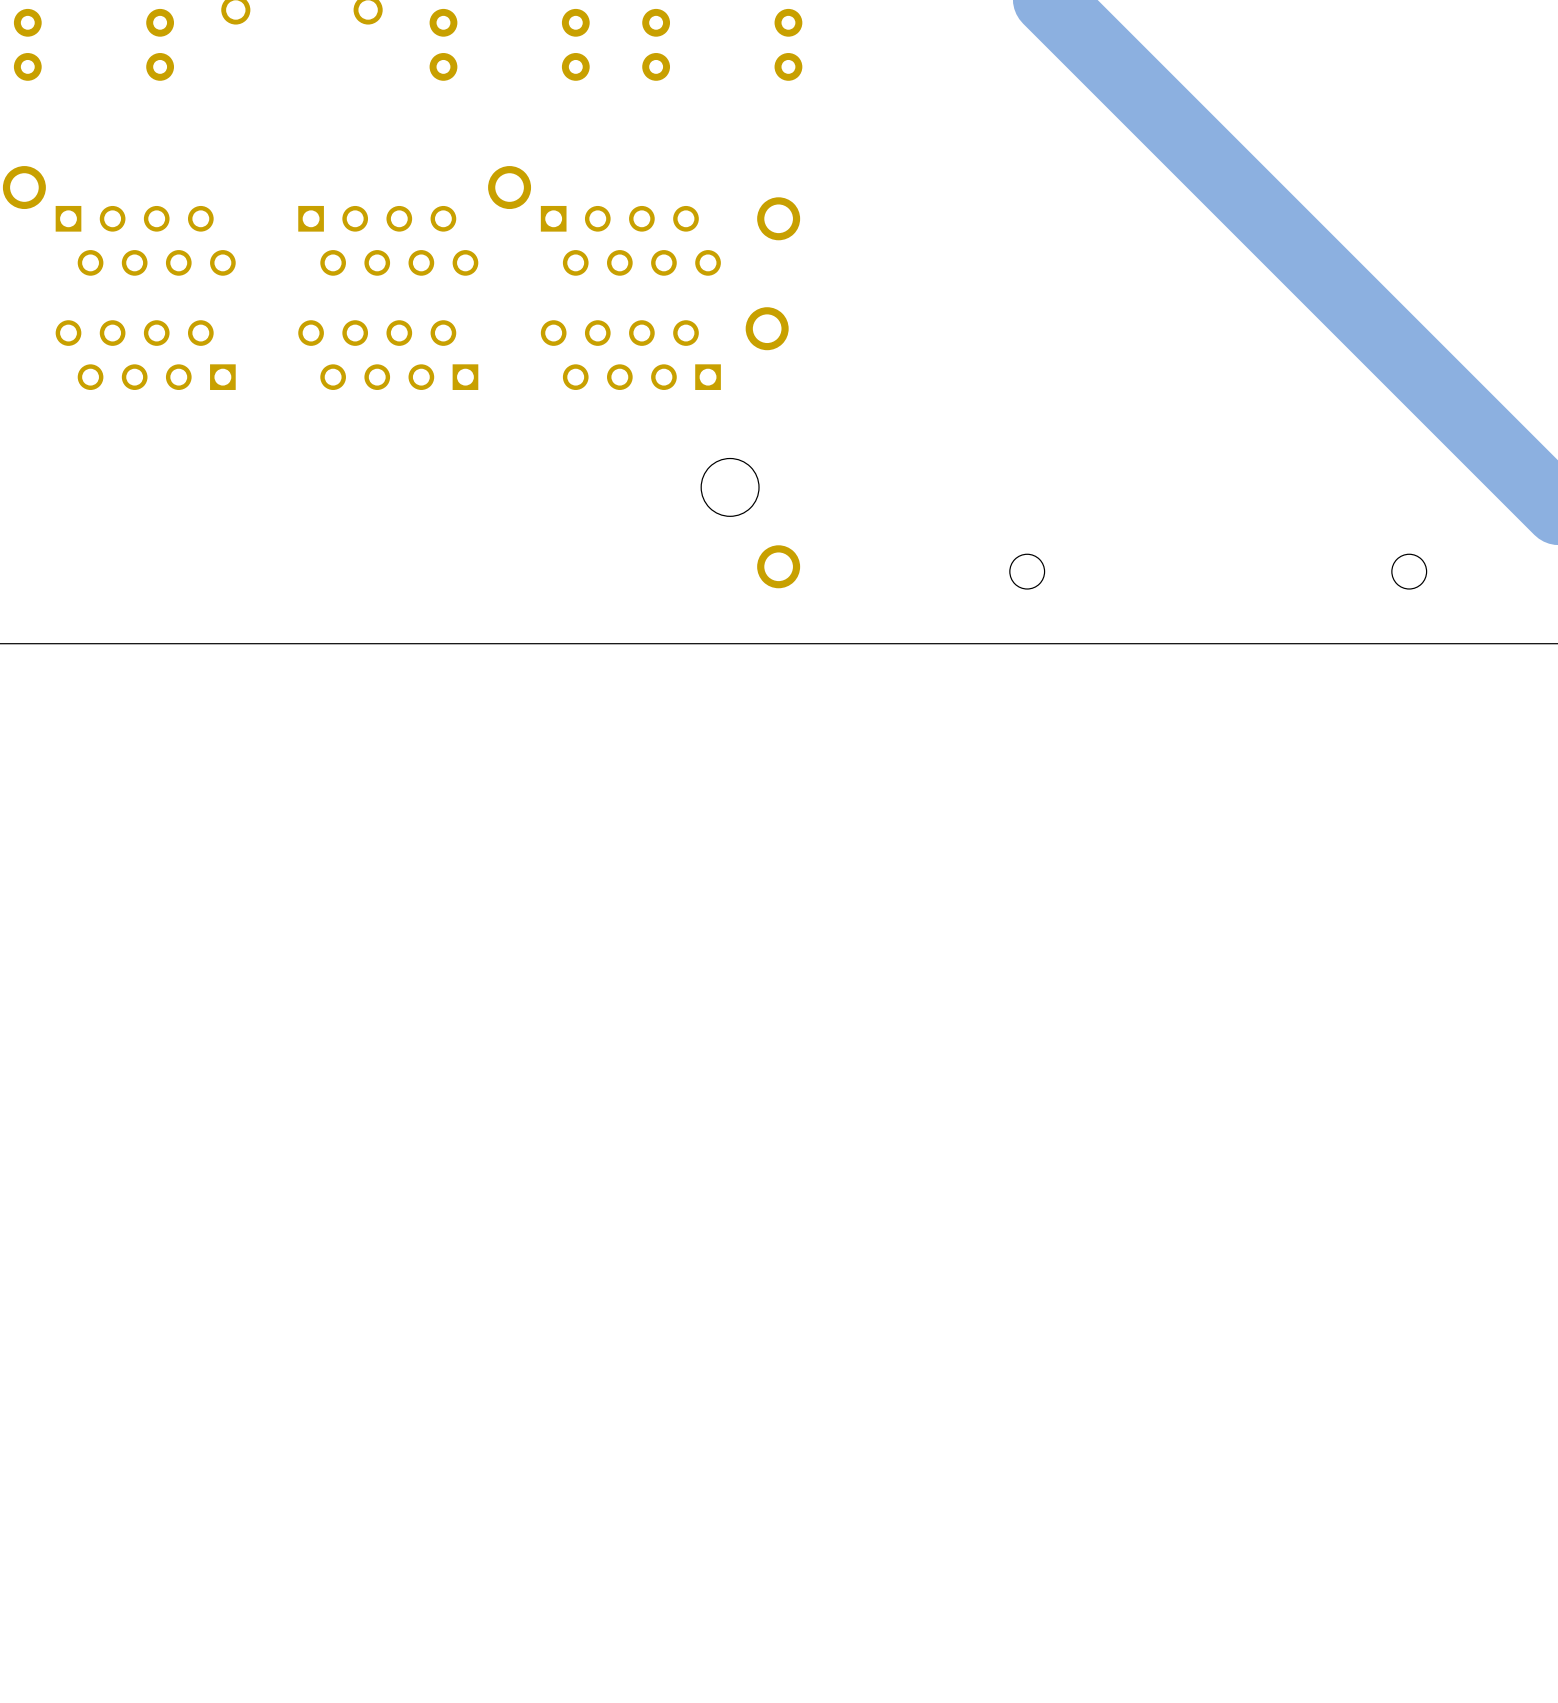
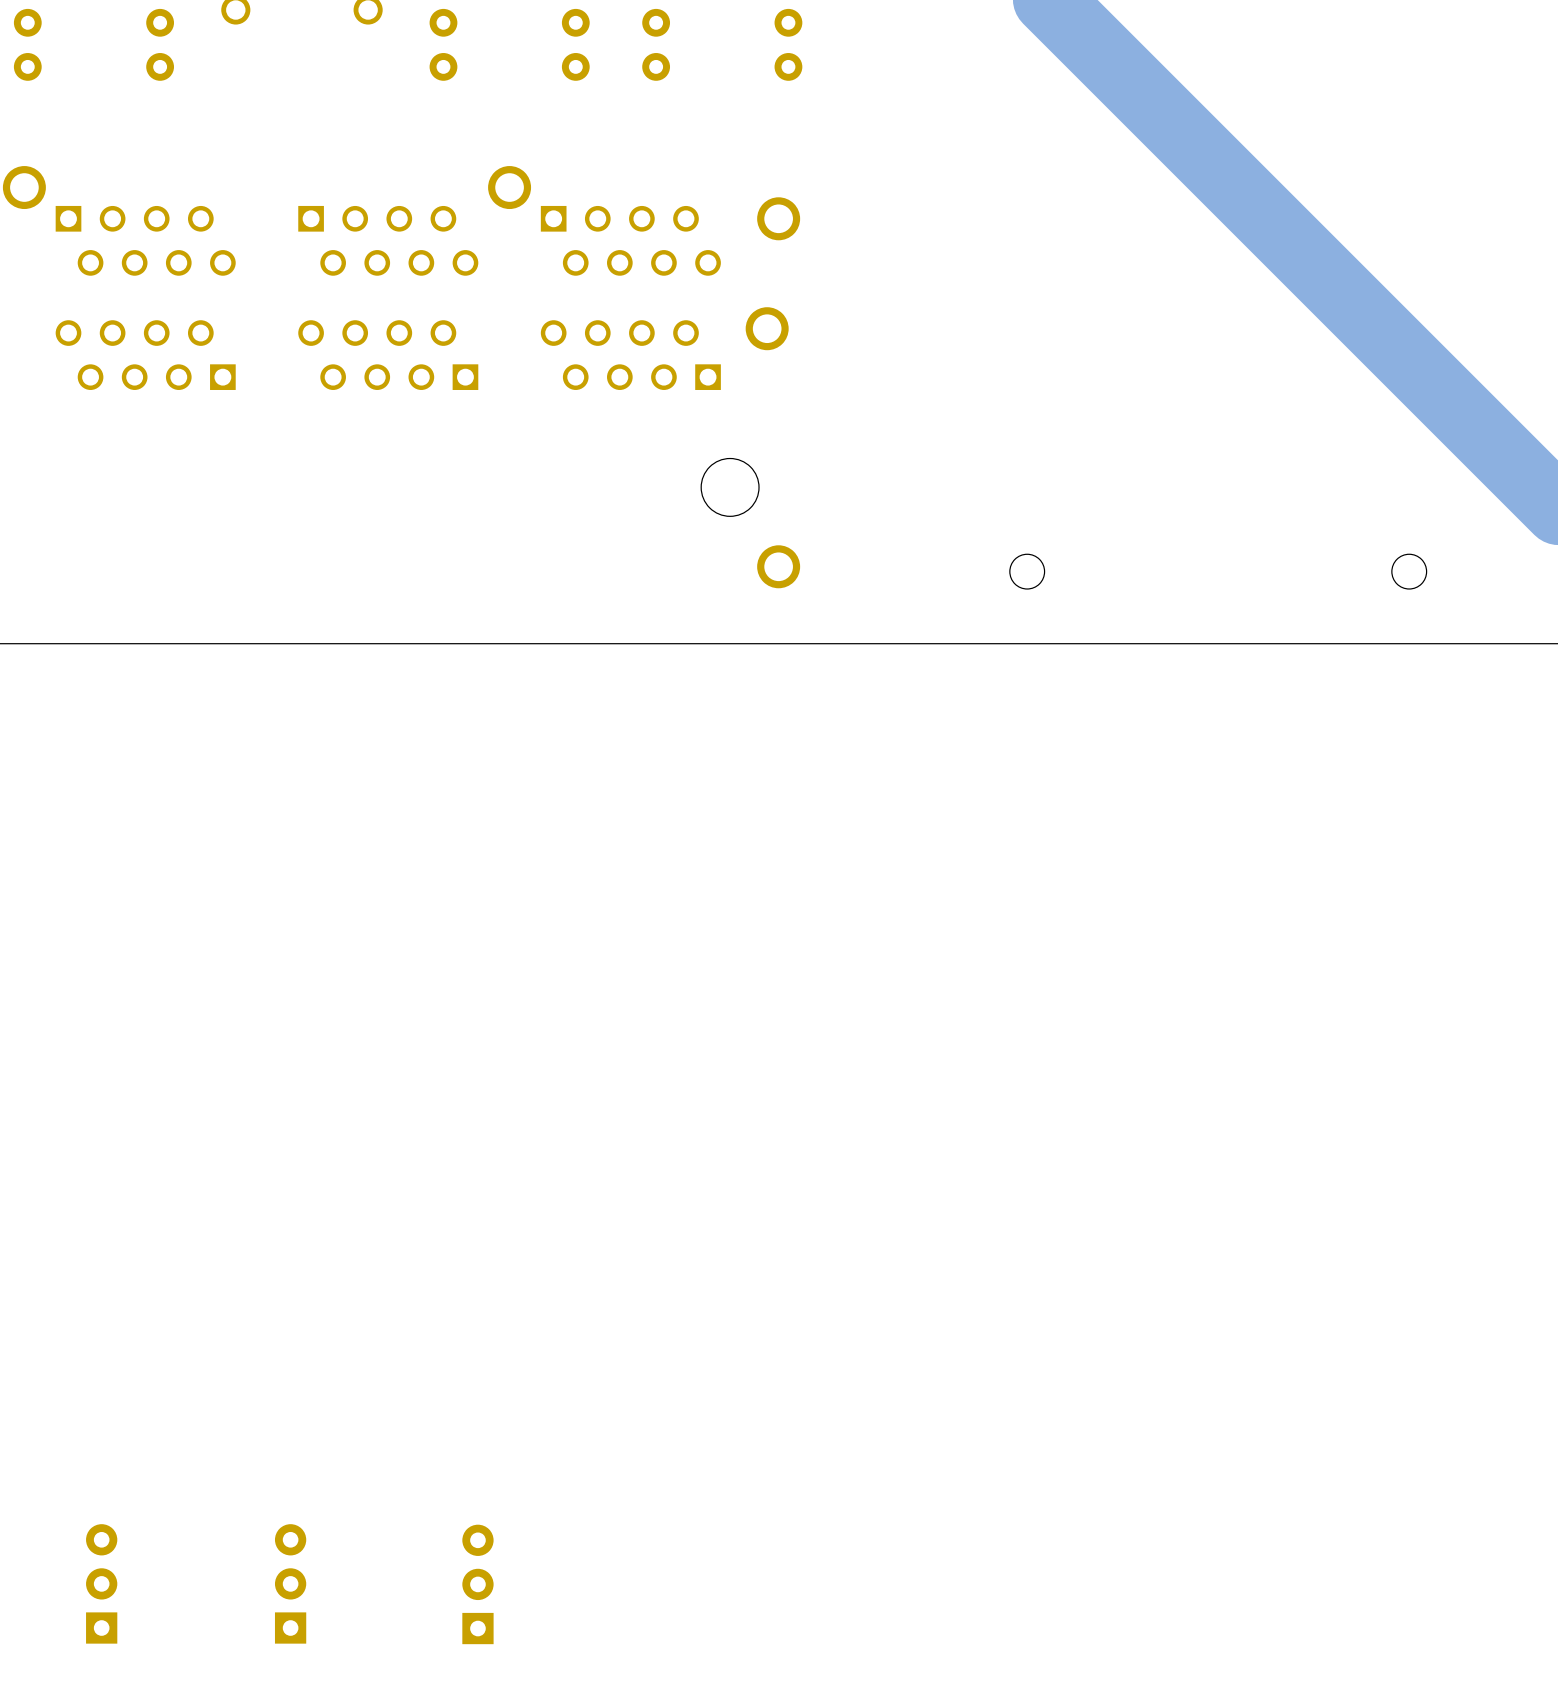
part: none -> (101, 1583)
part: none -> (290, 1583)
part: none -> (477, 1584)

